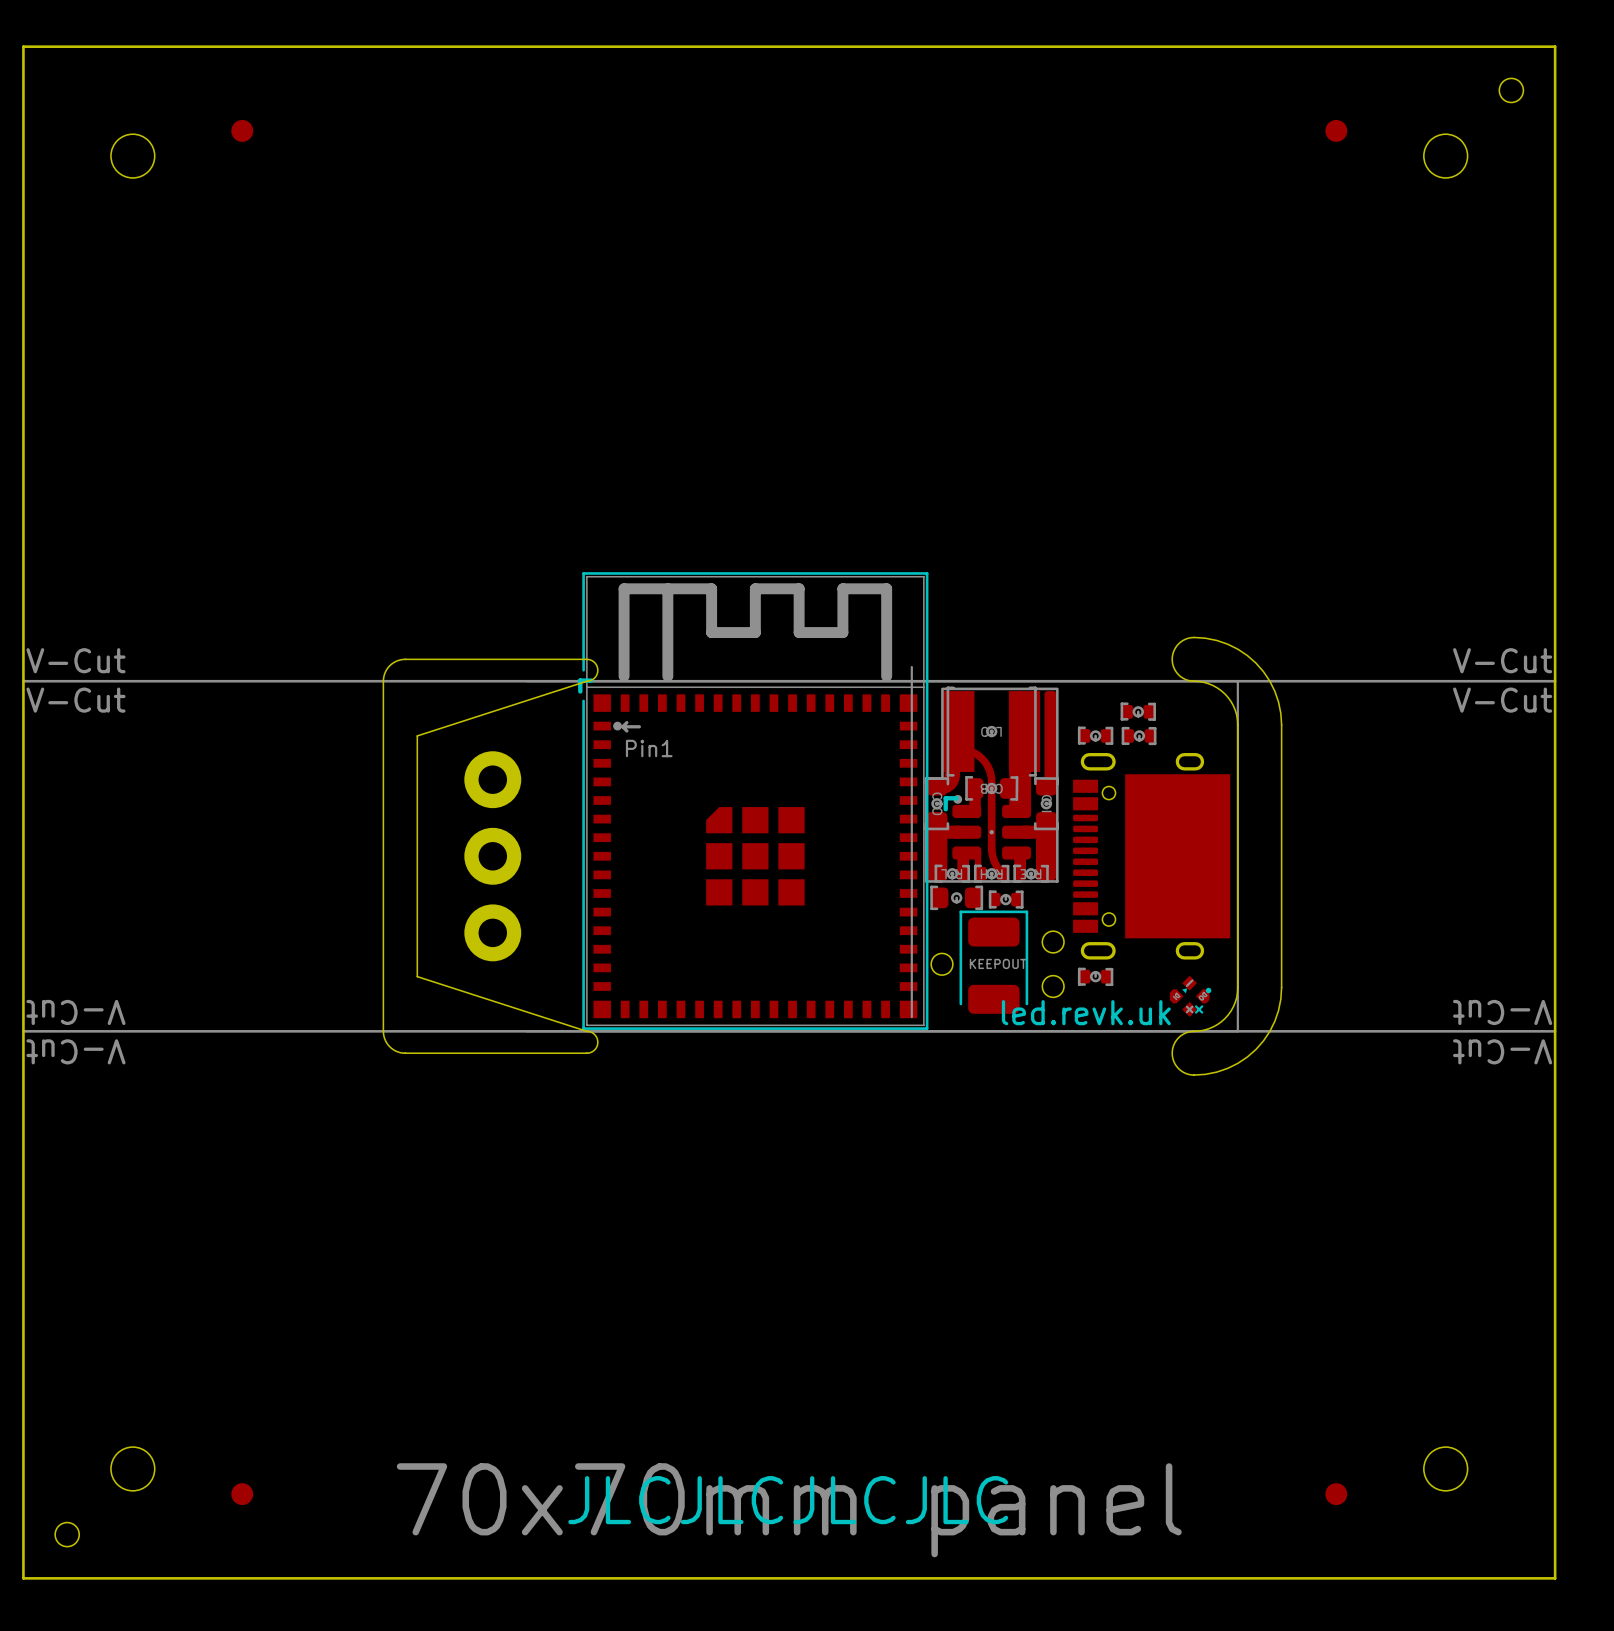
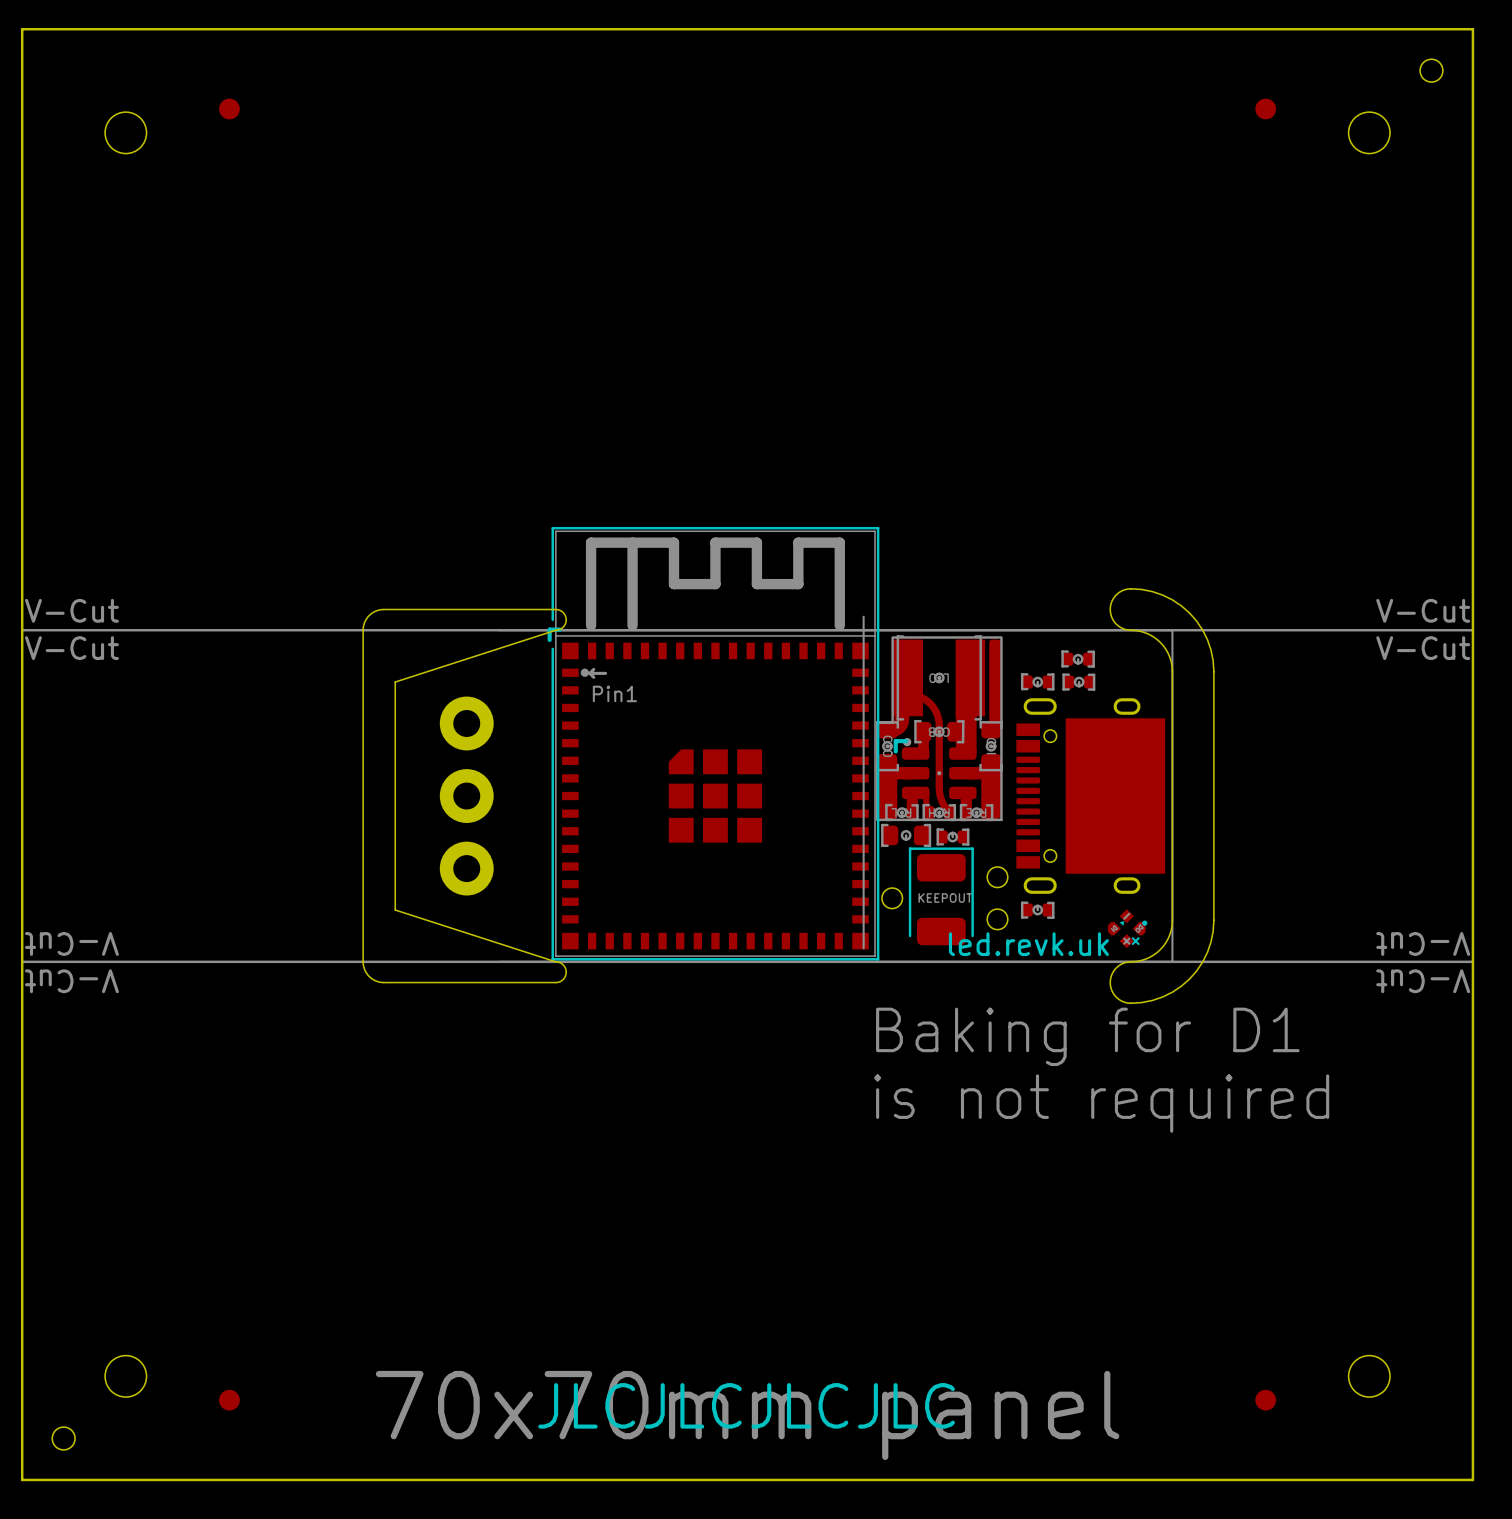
text: none -> Baking for D1 (1087, 1036)
text: none -> is not required (1101, 1103)

